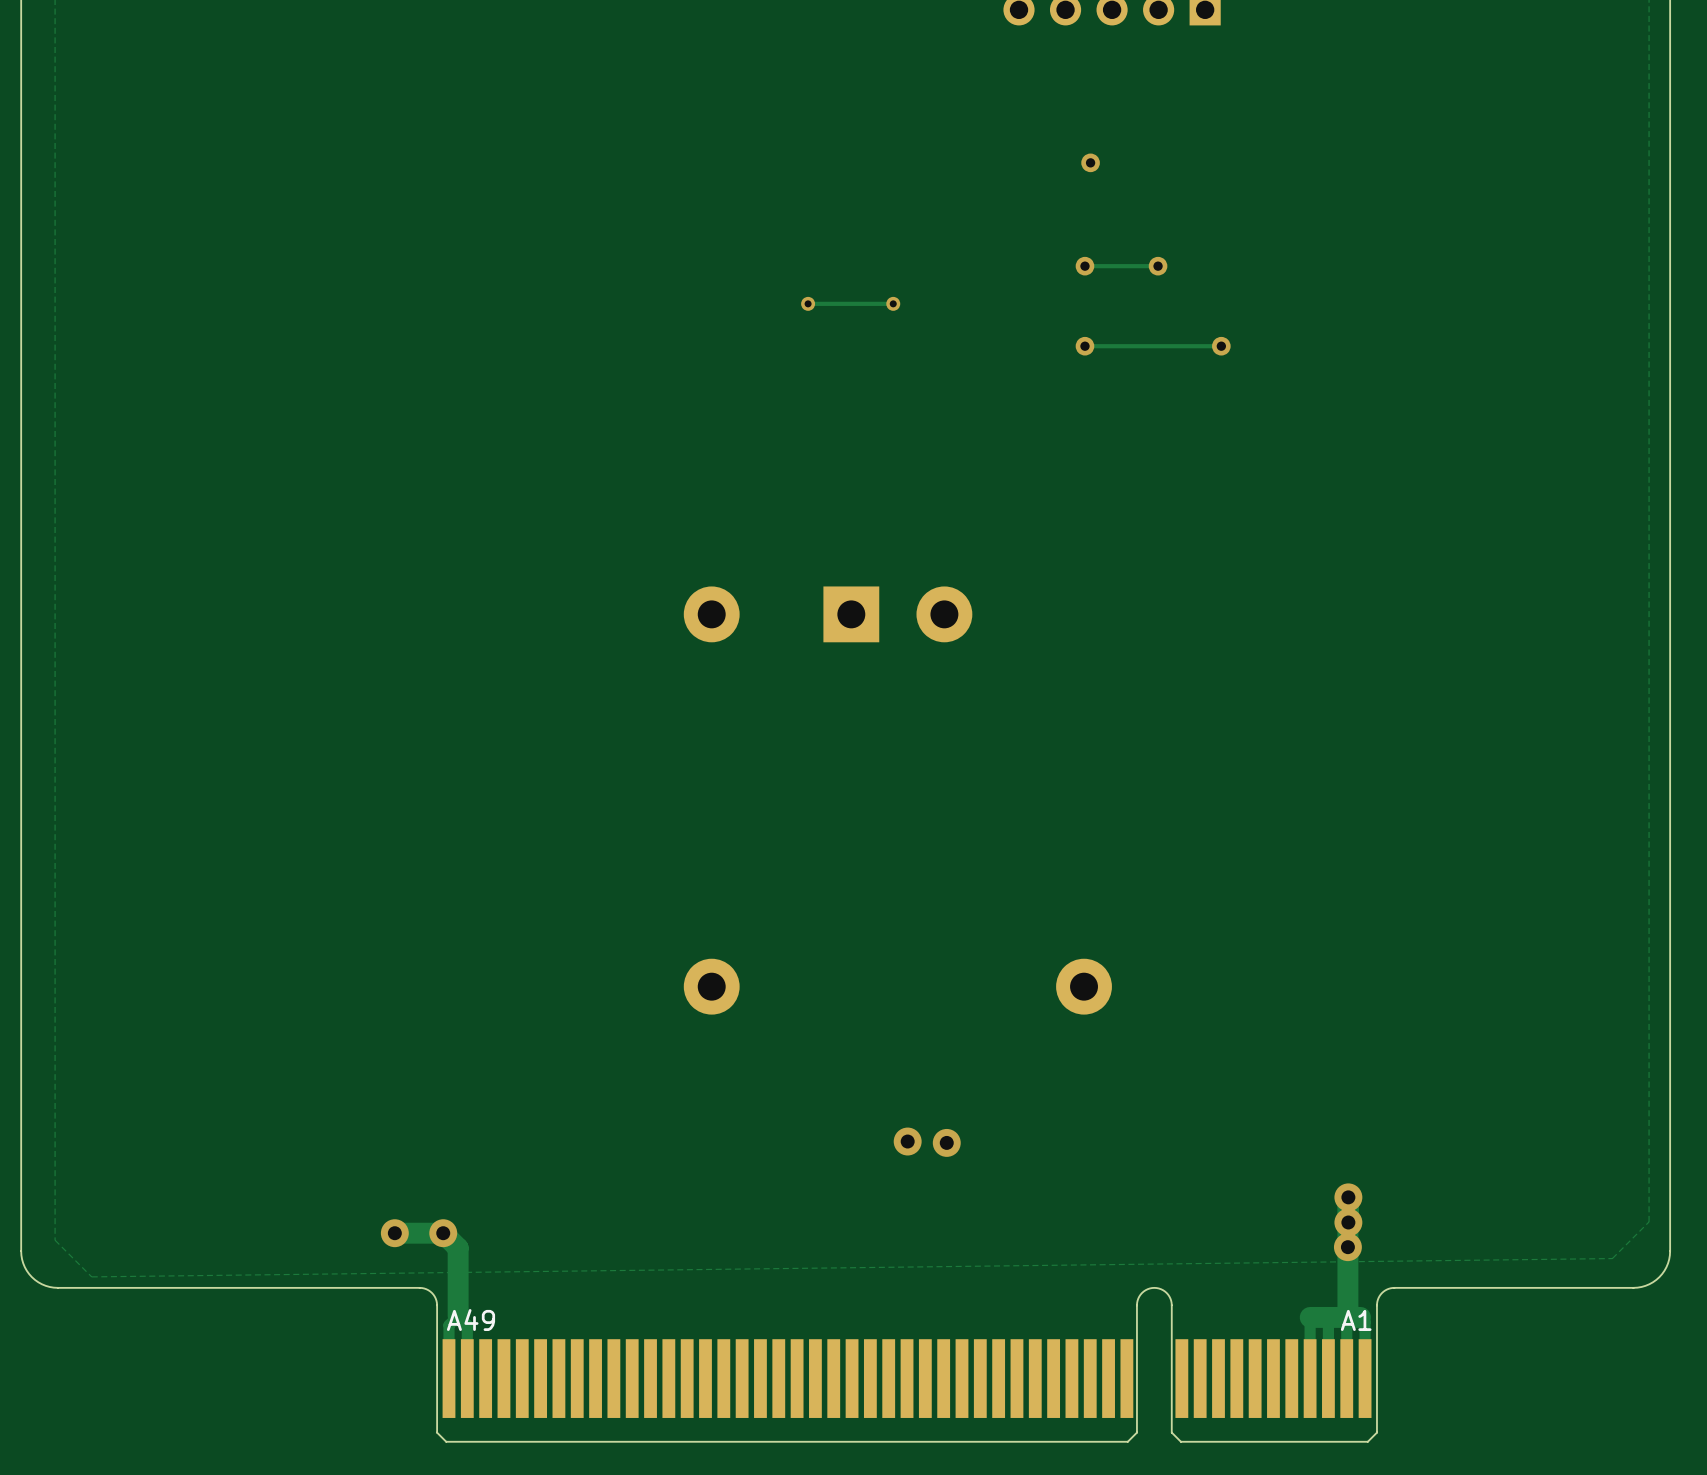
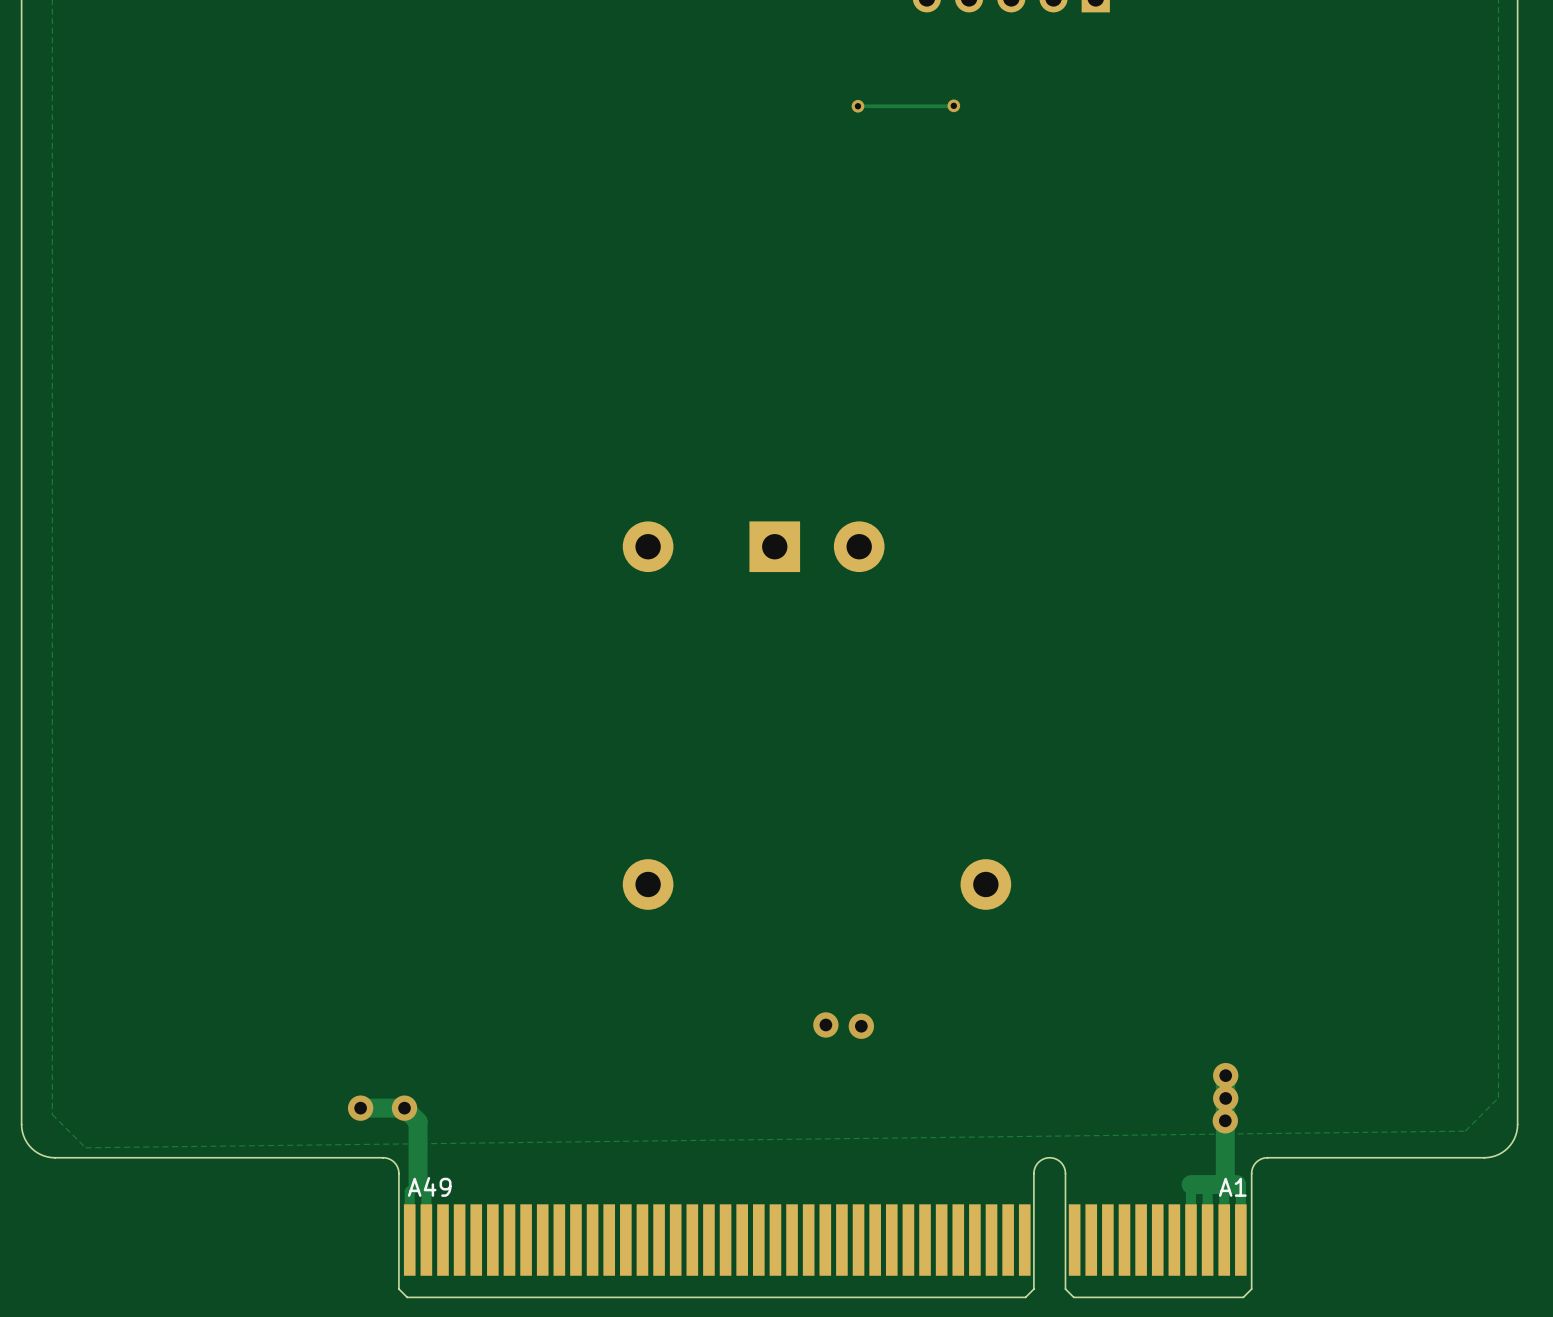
via: none -> (857, 106)
track: none -> (953, 105) (857, 106)
via: none -> (953, 105)
via: (1090, 162) -> none
via: (1084, 266) -> none
track: (1158, 266) (1084, 266) -> none
via: (1158, 266) -> none
via: (808, 303) -> none
track: (893, 303) (808, 303) -> none
via: (893, 303) -> none
via: (1084, 346) -> none
track: (1221, 346) (1084, 346) -> none
via: (1221, 346) -> none

